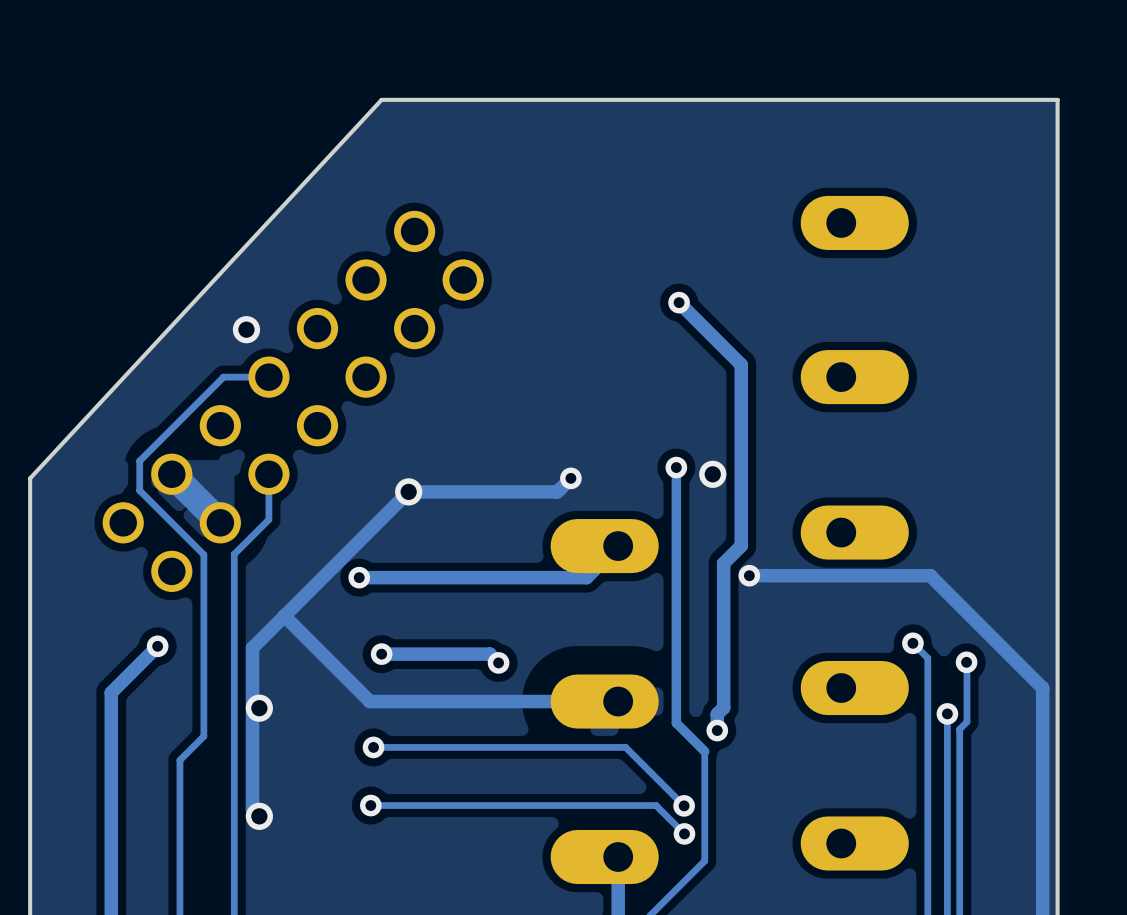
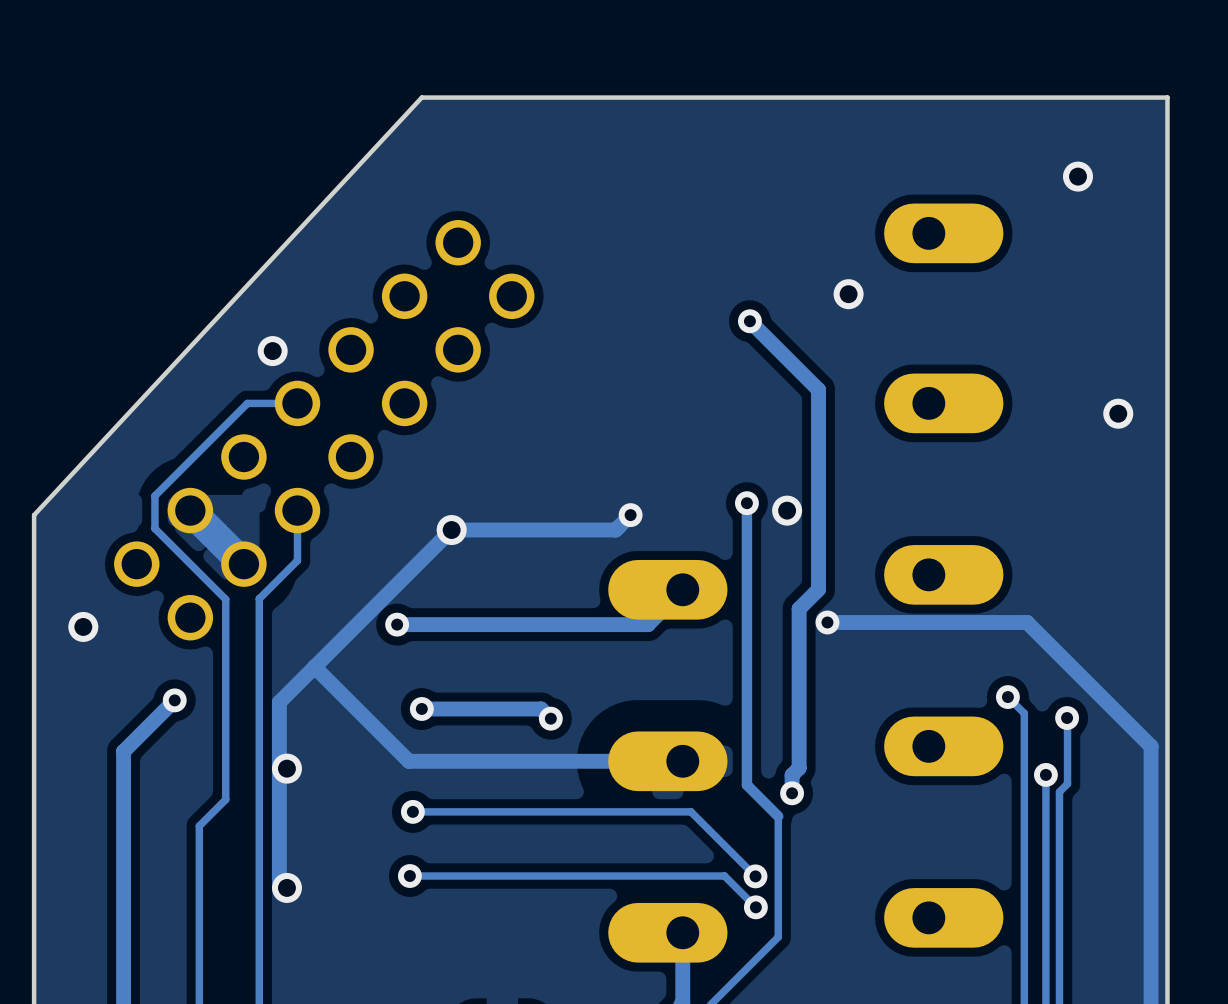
via: none -> (1078, 176)
via: none -> (848, 294)
via: none -> (1118, 413)
via: none -> (83, 626)

